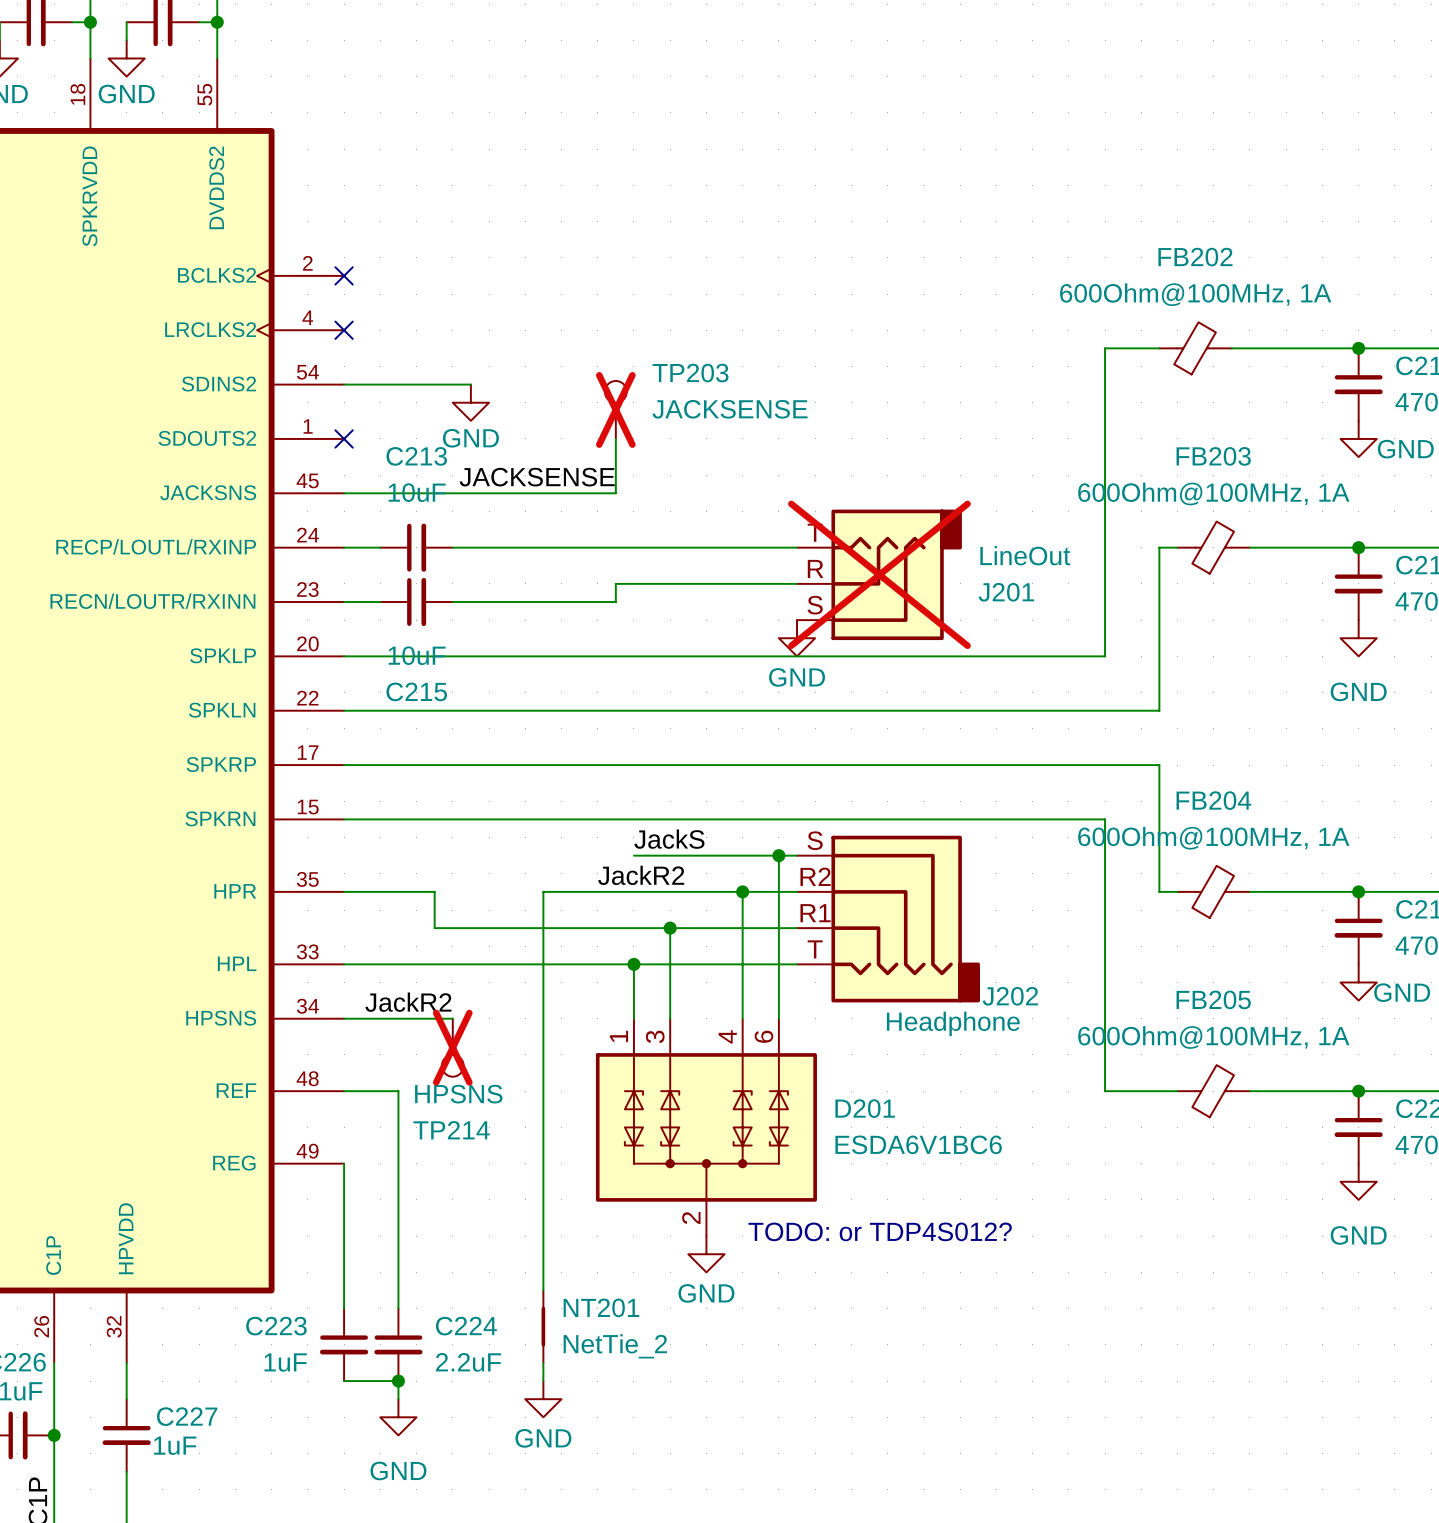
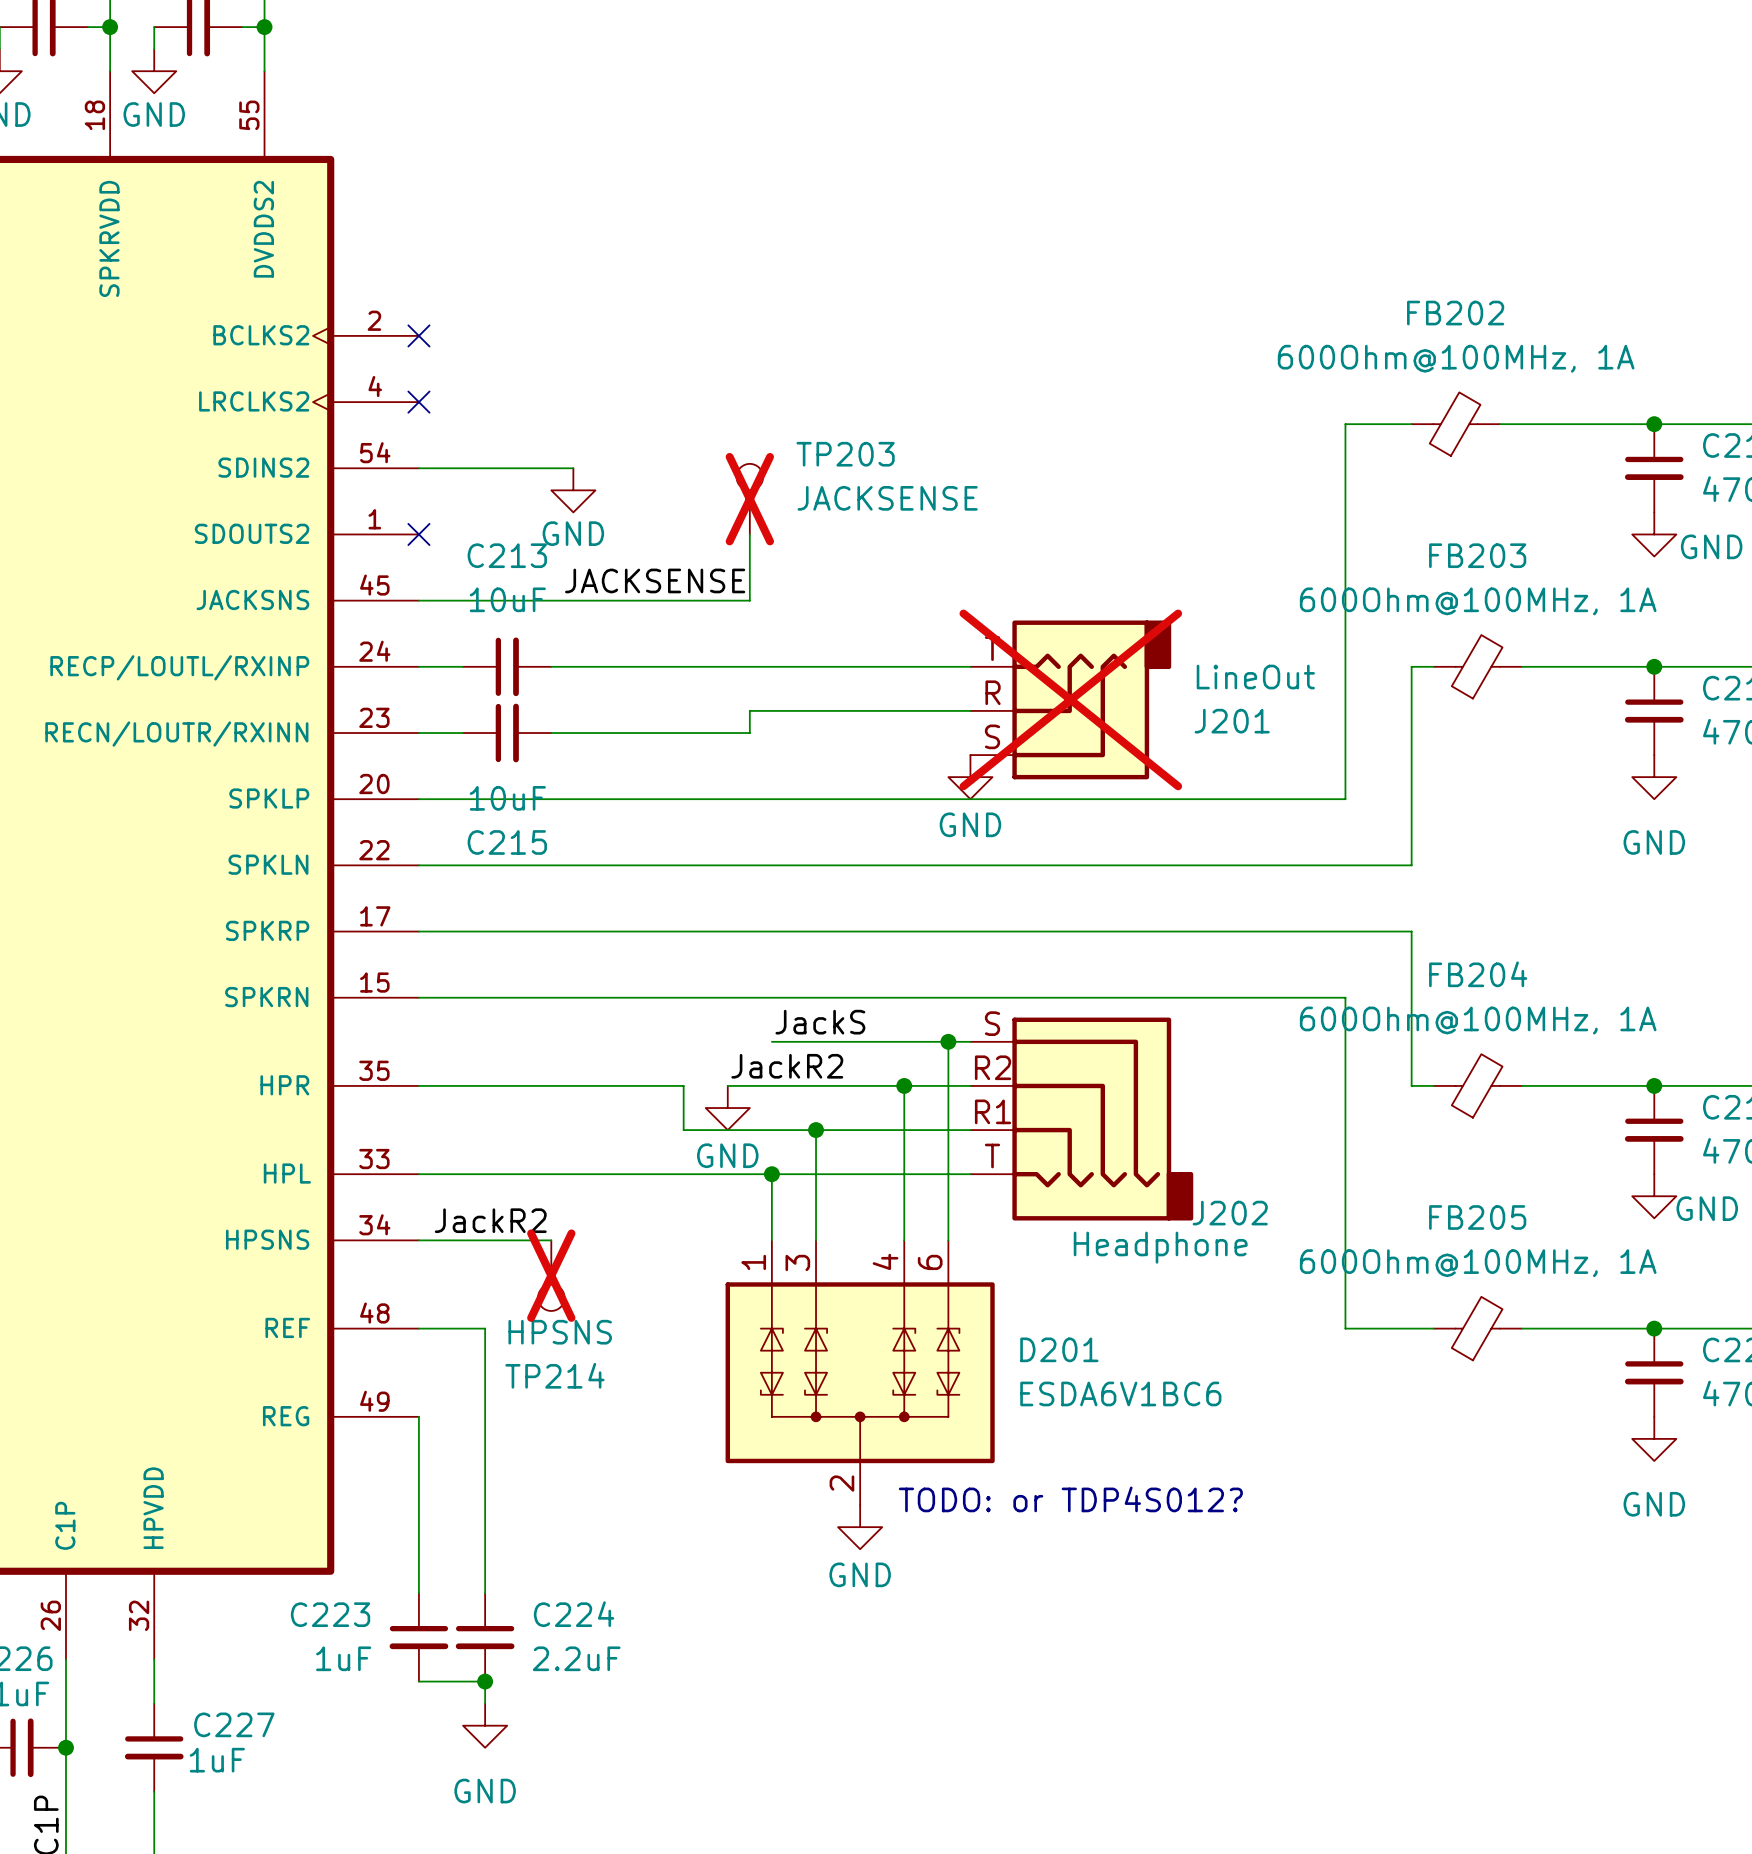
wire: (434, 891) (434, 928) (561, 928) -> (529, 1085) (661, 1085)
wire: (543, 891) (543, 1290) -> none
wire: (561, 891) (597, 891) -> (683, 1085) (683, 1130)
power symbol: none -> GND (727, 1108)
NT201: NetTie_2 (543, 1326) -> none
wire: (543, 1362) (543, 1381) -> none
power symbol: GND (543, 1399) -> none

